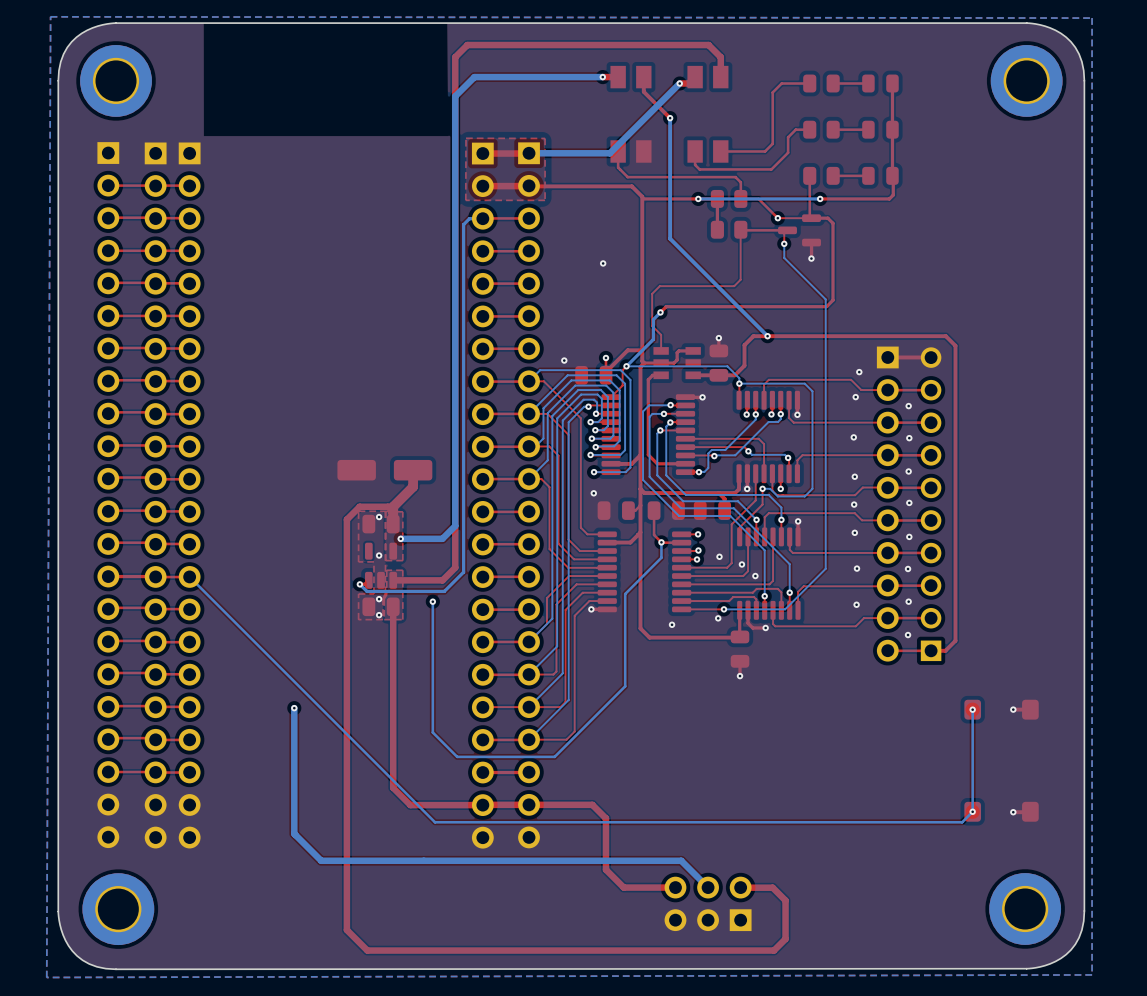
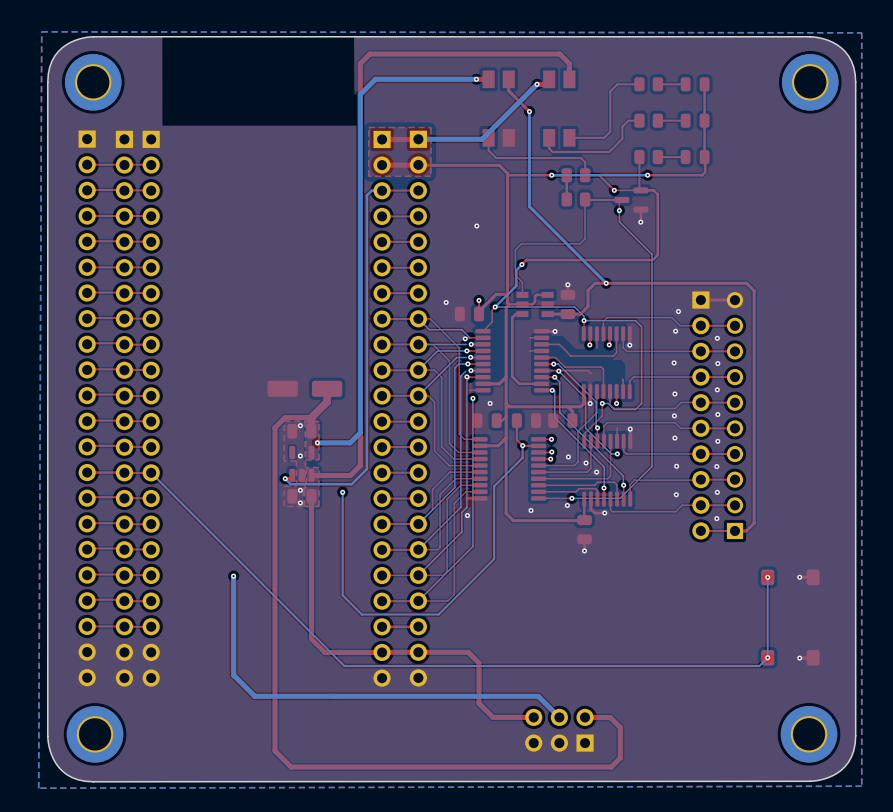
bottom track: (529, 381) (540, 370) (620, 370) (630, 379) (630, 467) (625, 472) (594, 472) -> (418, 318) (429, 329) (461, 329) (469, 337)
bottom track: (669, 405) (649, 405) (643, 411) (643, 479) (679, 516) (730, 516) (764, 550) (764, 596) -> (554, 390) (554, 417) (604, 467) (604, 488)
via: (670, 405) -> none
bottom track: (588, 406) (584, 406) (568, 422) (568, 700) -> (472, 398) (472, 546) (449, 569)
bottom track: (529, 413) (567, 375) (616, 375) (625, 383) (625, 450) (620, 454) (590, 454) -> (418, 344) (465, 344)
bottom track: (596, 413) (597, 402) (594, 399) (583, 399) (562, 420) (562, 673) -> (469, 377) (466, 380) (466, 507) (461, 512) (461, 531) (444, 548)
bottom track: (663, 413) (652, 413) (649, 416) (649, 476) (681, 508) (733, 508) (789, 564) (789, 592) -> (554, 377) (559, 382) (559, 412) (623, 476) (623, 485)
via: (663, 413) -> none
top track: (685, 413) (664, 413) -> (541, 344) (559, 344) (570, 355) (613, 355) (616, 352) (616, 345)
bottom track: (755, 414) (755, 419) (725, 449) (711, 449) (708, 453) (708, 468) (704, 471) (698, 472) -> none
via: (755, 414) -> none
bottom track: (780, 414) (780, 419) (777, 421) (768, 421) (735, 455) (714, 455) -> none
via: (780, 414) -> none
bottom track: (594, 422) (598, 422) (601, 418) (601, 398) (597, 394) (581, 394) (557, 418) (557, 646) -> (465, 371) (460, 376) (460, 507) (440, 527)
via: (670, 422) -> none
bottom track: (671, 422) (666, 426) (666, 475) (685, 494) (768, 494) (781, 507) (781, 519) -> none
bottom track: (595, 430) (603, 430) (607, 426) (607, 397) (600, 390) (578, 390) (552, 415) (552, 618) -> (469, 364) (458, 364) (454, 368) (454, 487) (436, 505)
bottom track: (660, 430) (657, 433) (657, 475) (683, 501) (737, 501) (756, 519) -> none
via: (660, 430) -> none
top track: (685, 430) (660, 430) -> none
bottom track: (591, 438) (610, 438) (613, 435) (613, 392) (606, 385) (575, 385) (547, 413) (547, 460) -> (466, 357) (456, 357) (433, 381)
top track: (700, 438) (758, 438) (764, 445) -> (541, 357) (555, 357) (564, 367) (601, 367) (603, 369)
bottom track: none -> (553, 364) (558, 364) (596, 402) (596, 425) (598, 427)
via: none -> (553, 364)
bottom track: (529, 446) (535, 446) (543, 438) (543, 408) (571, 380) (609, 380) (619, 390) (619, 440) (614, 446) (595, 447) -> (418, 370) (437, 350) (466, 350)
bottom track: none -> (558, 371) (585, 397) (585, 428) (611, 453) (617, 453)
via: none -> (558, 371)
bottom track: (748, 451) (751, 454) (785, 454) (788, 457) -> none
via: (748, 451) -> none
top track: (702, 455) (714, 455) -> none
via: none -> (554, 377)
via: (714, 456) -> none
via: (788, 457) -> none
via: (594, 472) -> none
via: none -> (472, 398)
via: none -> (490, 403)
via: (593, 493) -> none
via position: (781, 519) -> (617, 453)
via position: (591, 609) -> (467, 515)

